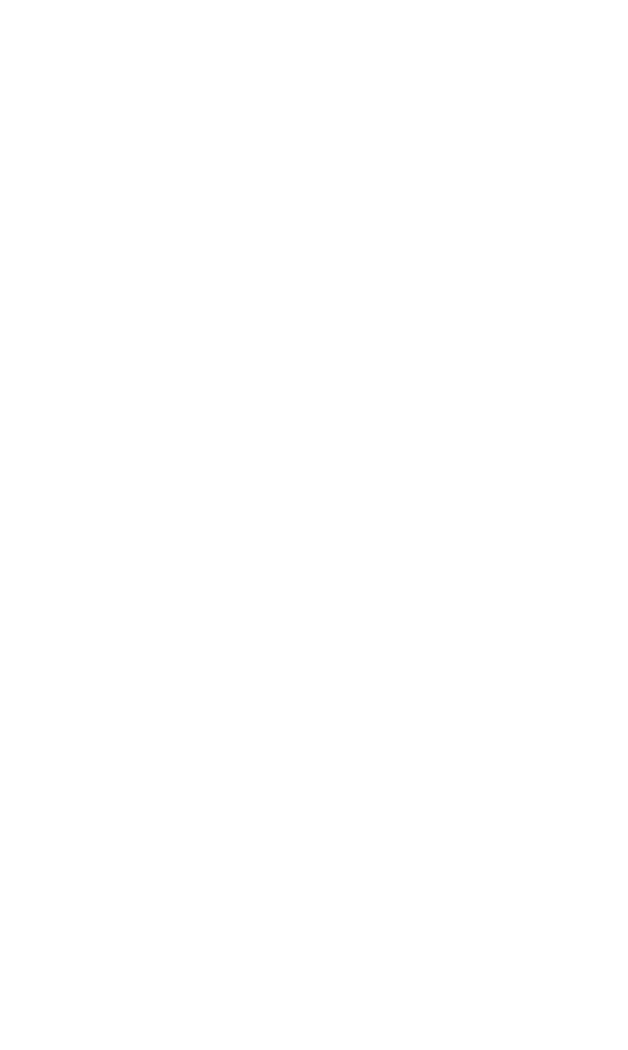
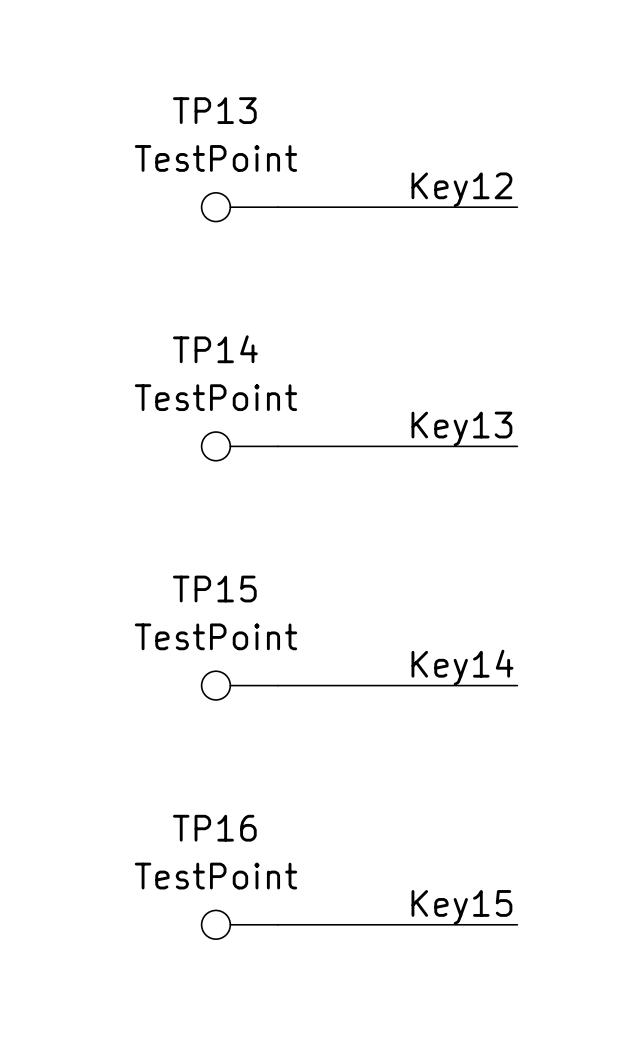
label: none -> Key12 (461, 189)
TP13: none -> TestPoint (239, 207)
wire: none -> (278, 207) (517, 207)
label: none -> Key13 (461, 429)
TP14: none -> TestPoint (239, 446)
wire: none -> (278, 446) (517, 446)
label: none -> Key14 (462, 667)
TP15: none -> TestPoint (239, 685)
wire: none -> (278, 685) (517, 685)
label: none -> Key15 (461, 907)
TP16: none -> TestPoint (239, 924)
wire: none -> (278, 924) (517, 924)

